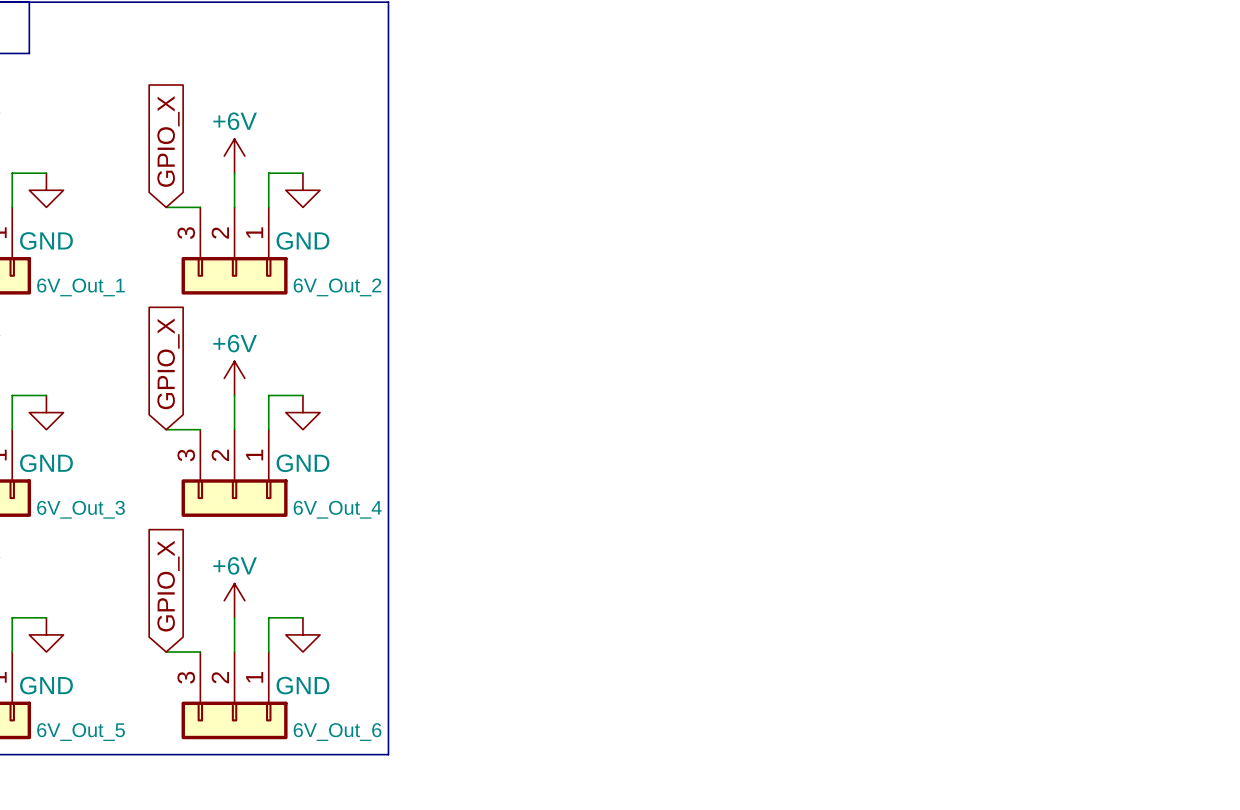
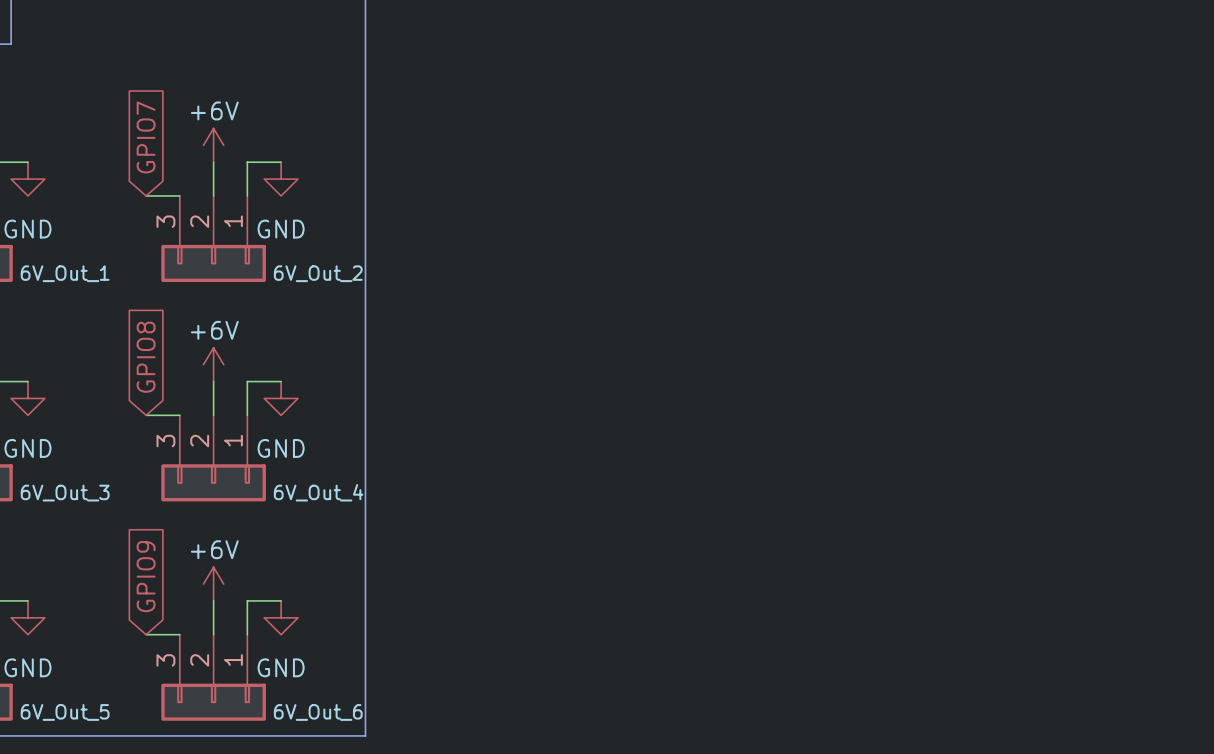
global label: GPIO_X (168, 141) -> GPIO7 (146, 137)
global label: GPIO_X (168, 363) -> GPIO8 (146, 357)
global label: GPIO_X (168, 586) -> GPIO9 (146, 576)

